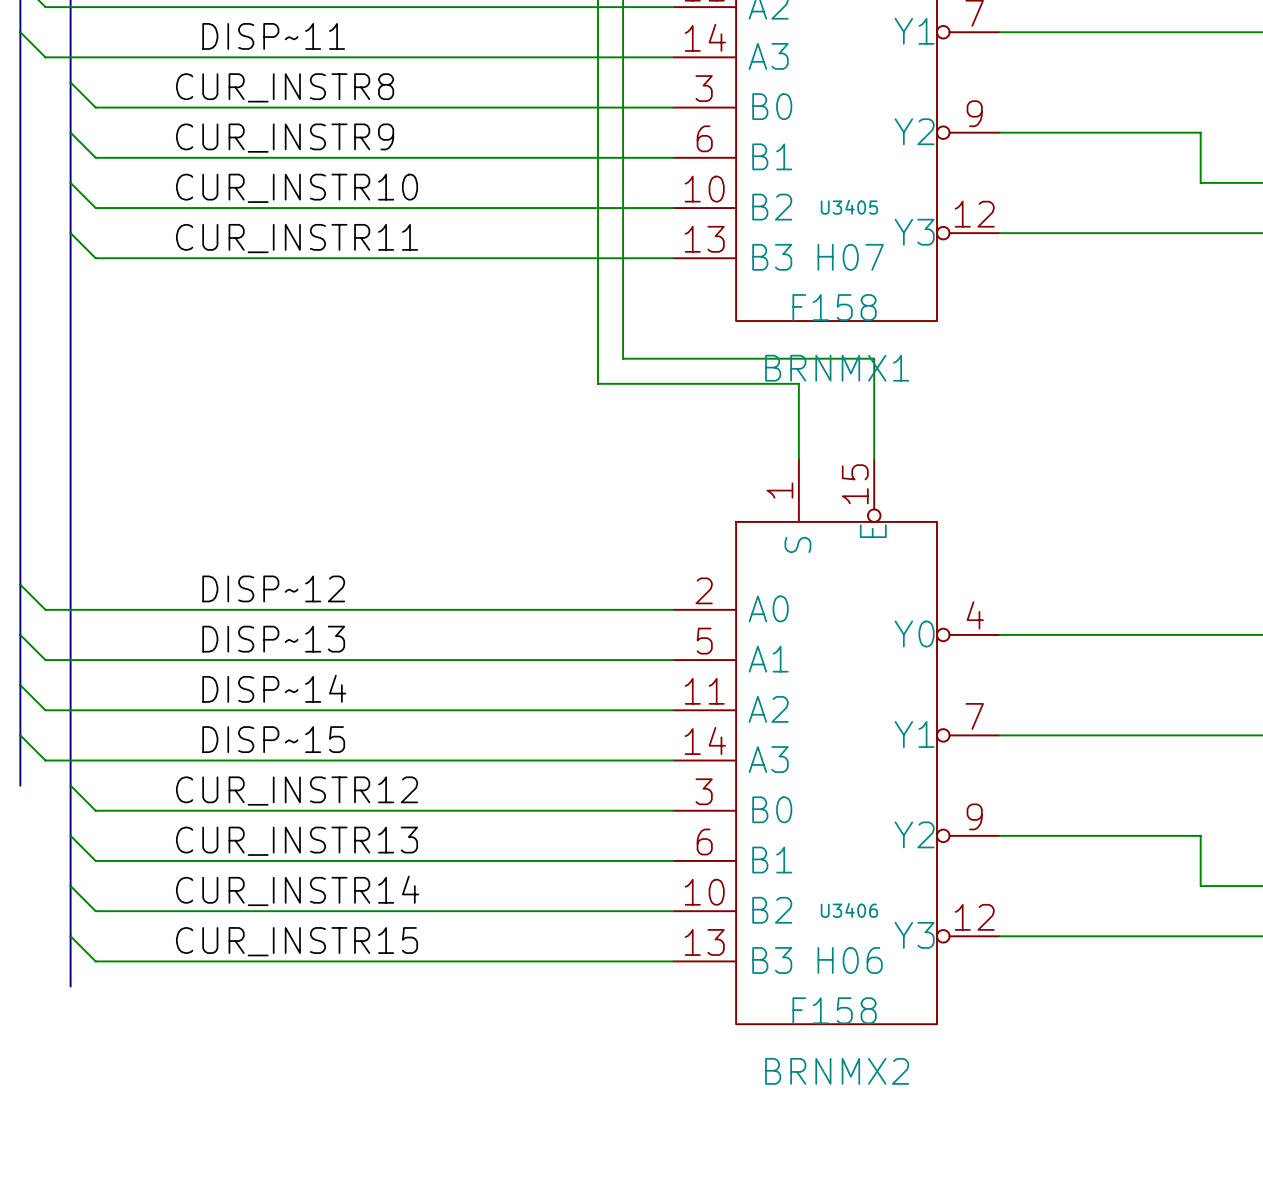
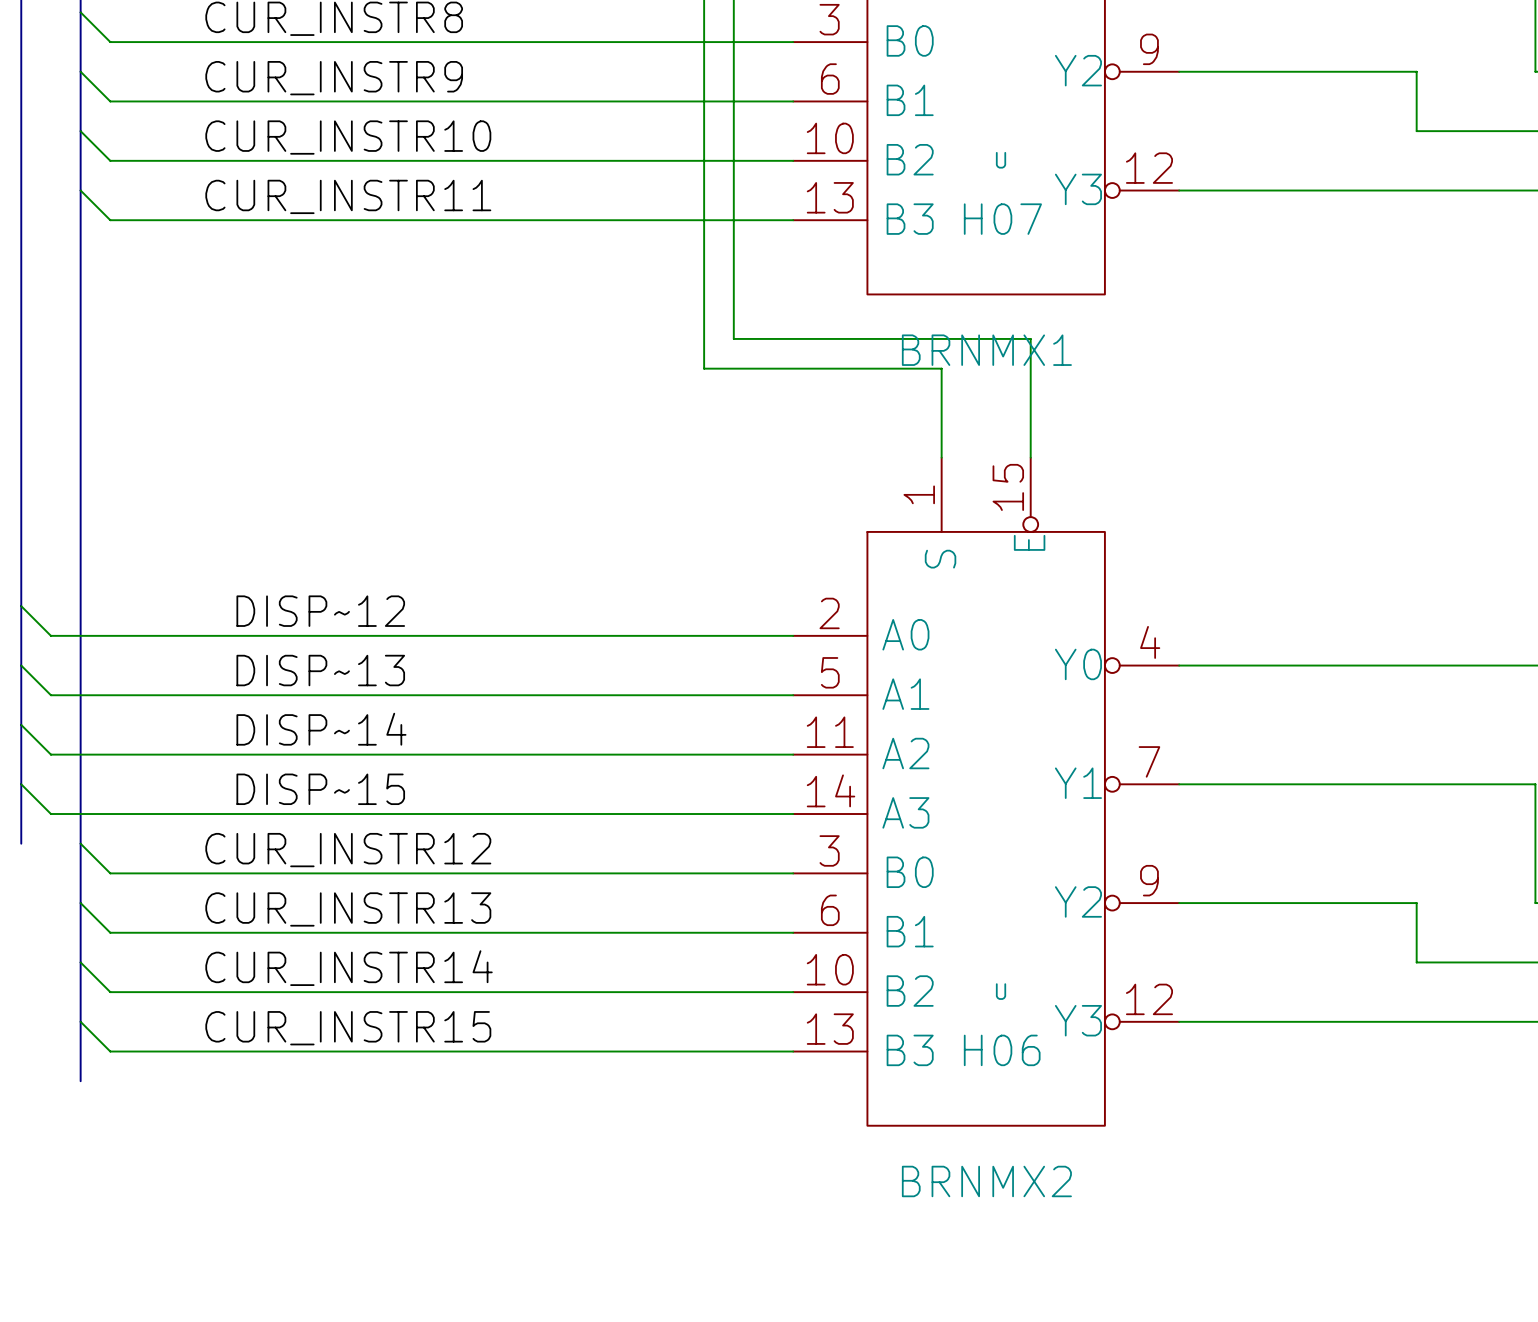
U3405 name: U3405 (849, 207) -> U (1001, 160)
U3405 value: F158 (834, 307) -> none
U3406 name: U3406 (849, 910) -> U (1001, 991)
U3406 value: F158 (834, 1010) -> none

